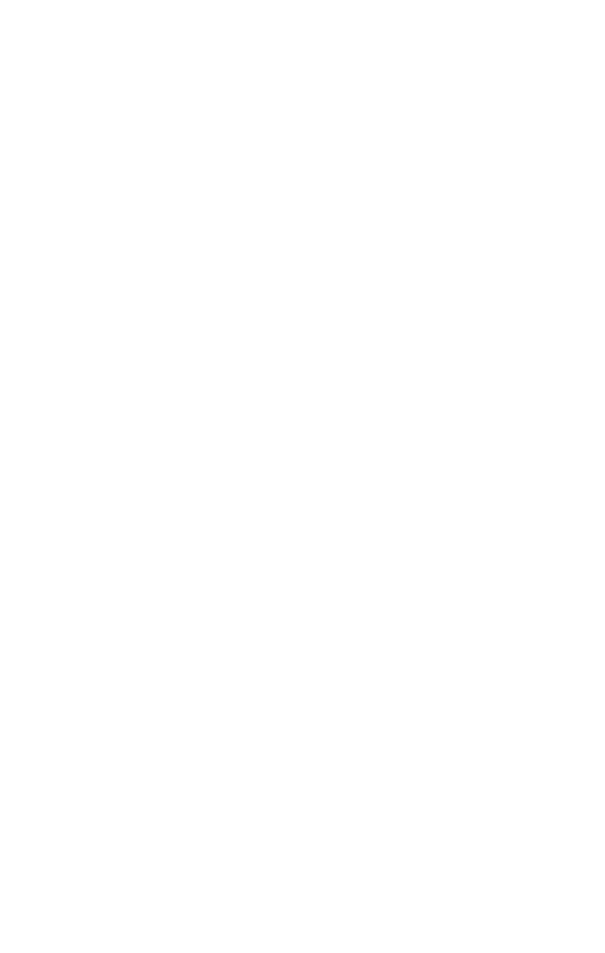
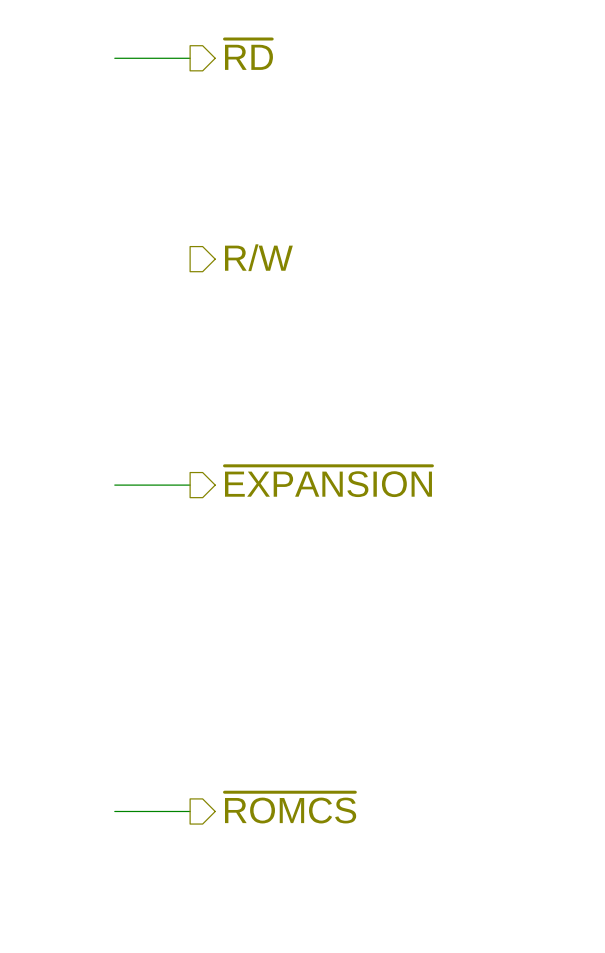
hierarchical label: none -> ~{RD} (248, 54)
wire: none -> (114, 58) (190, 58)
hierarchical label: none -> R/W (258, 257)
hierarchical label: none -> ~{EXPANSION} (328, 481)
wire: none -> (114, 485) (190, 485)
hierarchical label: none -> ~{ROMCS} (290, 807)
wire: none -> (114, 811) (190, 811)

